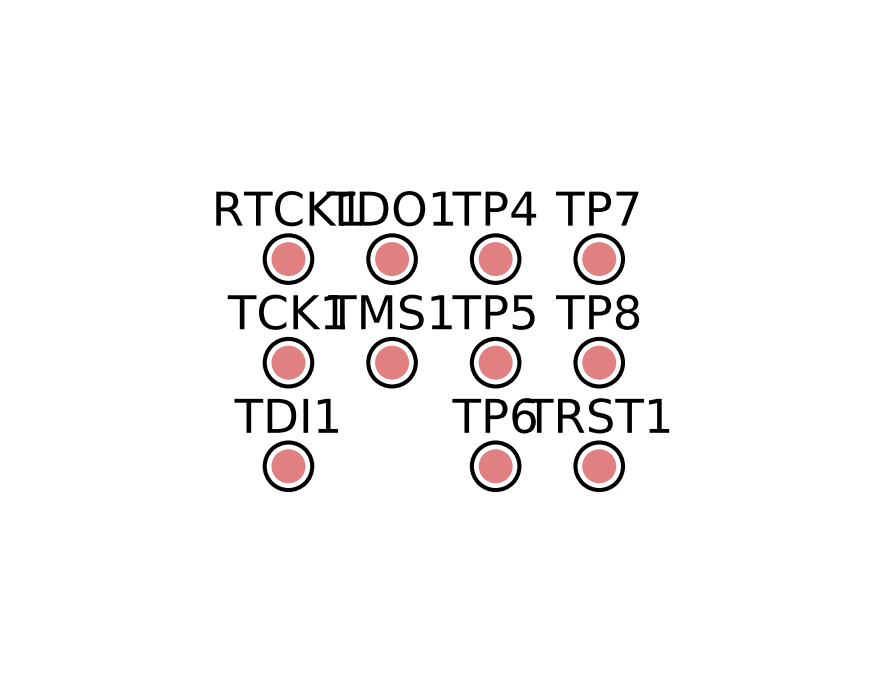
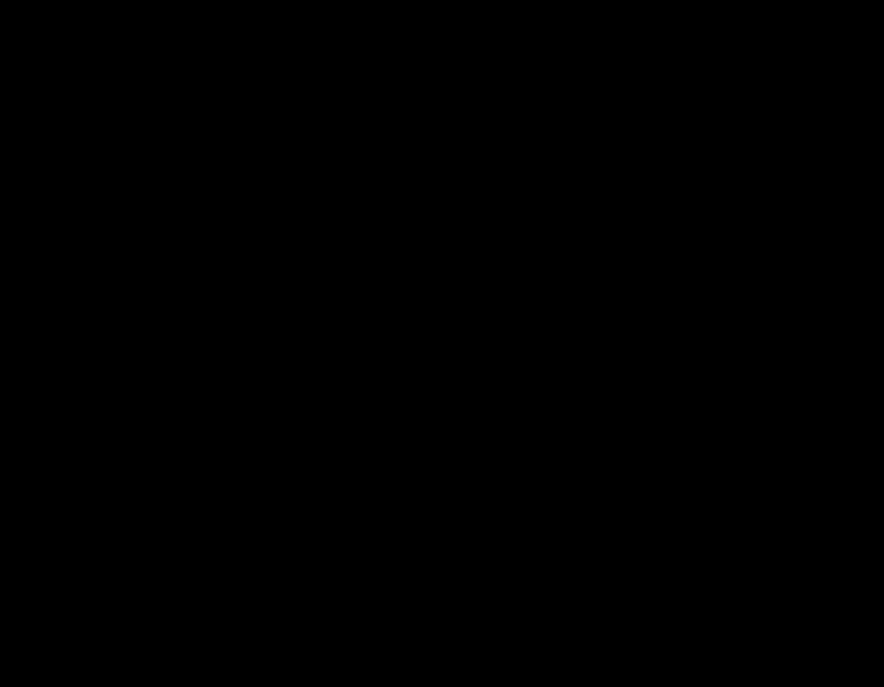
RTCK1: (288, 259) -> none
TDO1: (392, 259) -> none
TP4: (495, 259) -> none
TP7: (599, 259) -> none
TCK1: (288, 362) -> none
TMS1: (392, 362) -> none
TP5: (495, 362) -> none
TP8: (599, 362) -> none
TDI1: (288, 466) -> none
TP6: (495, 466) -> none
TRST1: (599, 466) -> none

